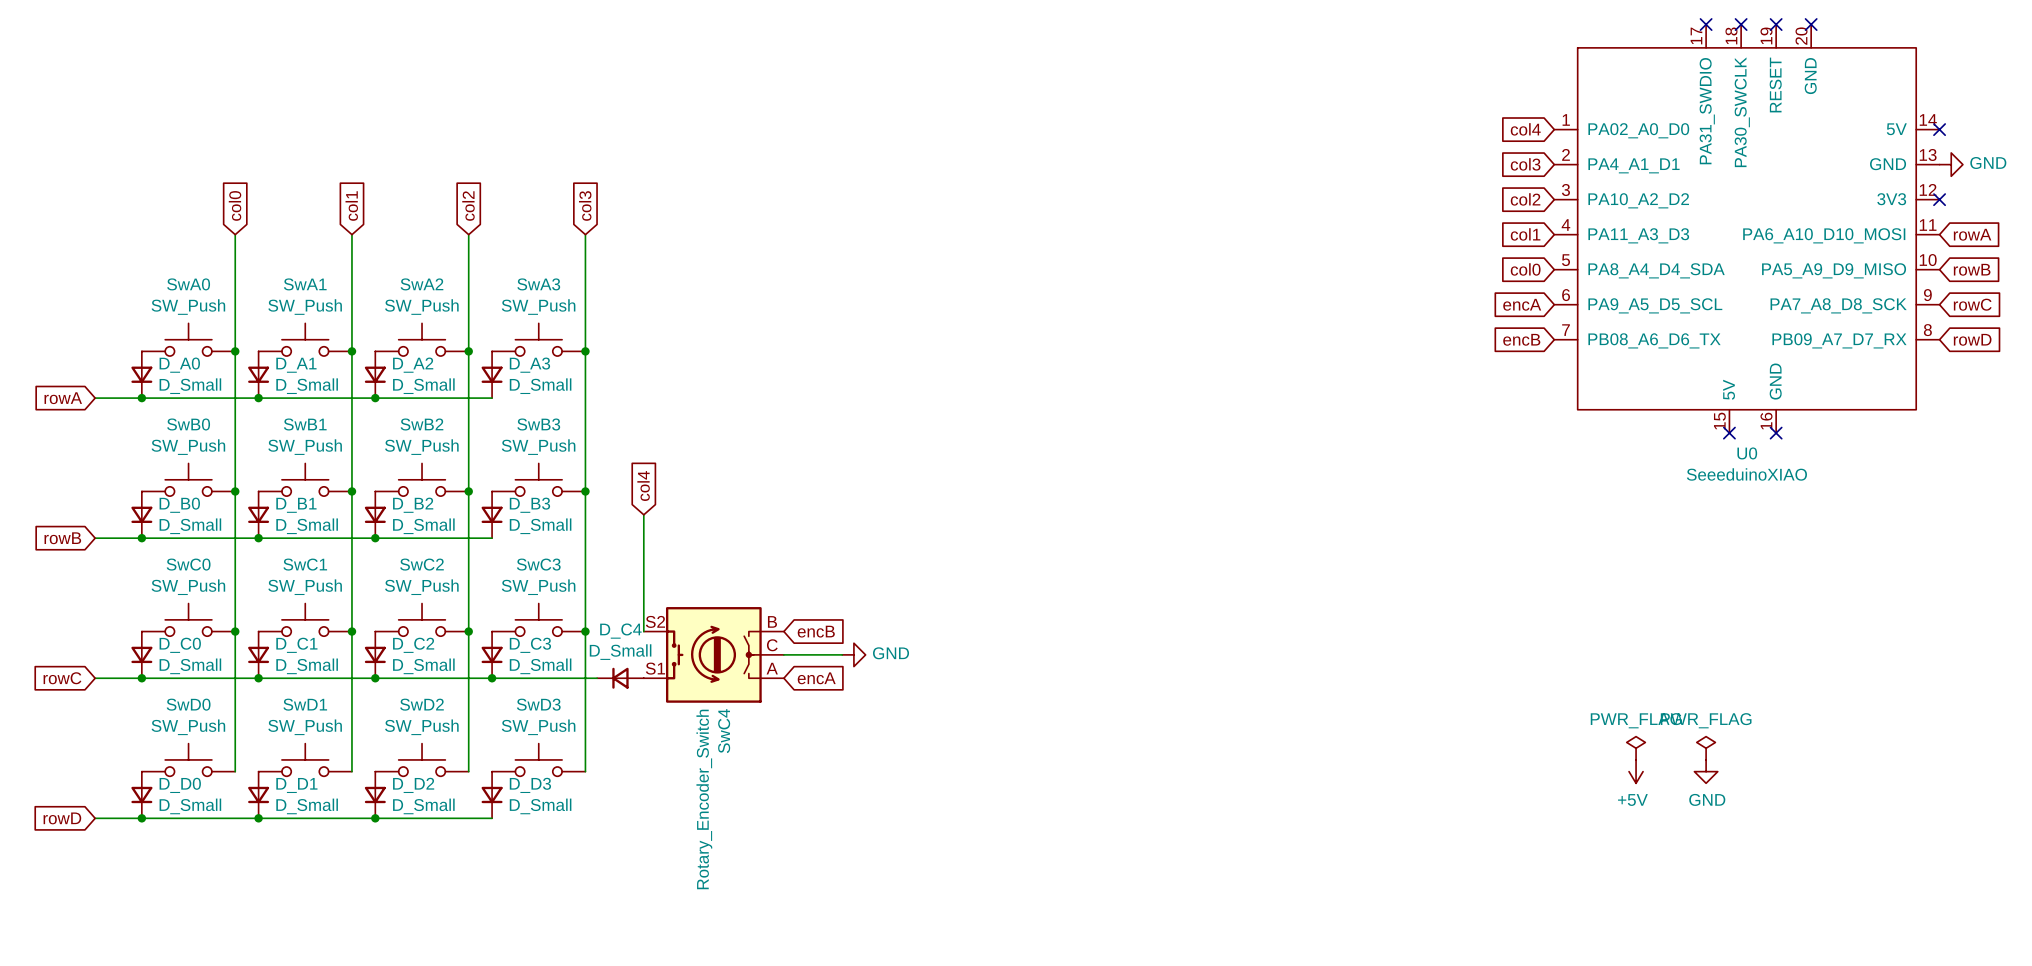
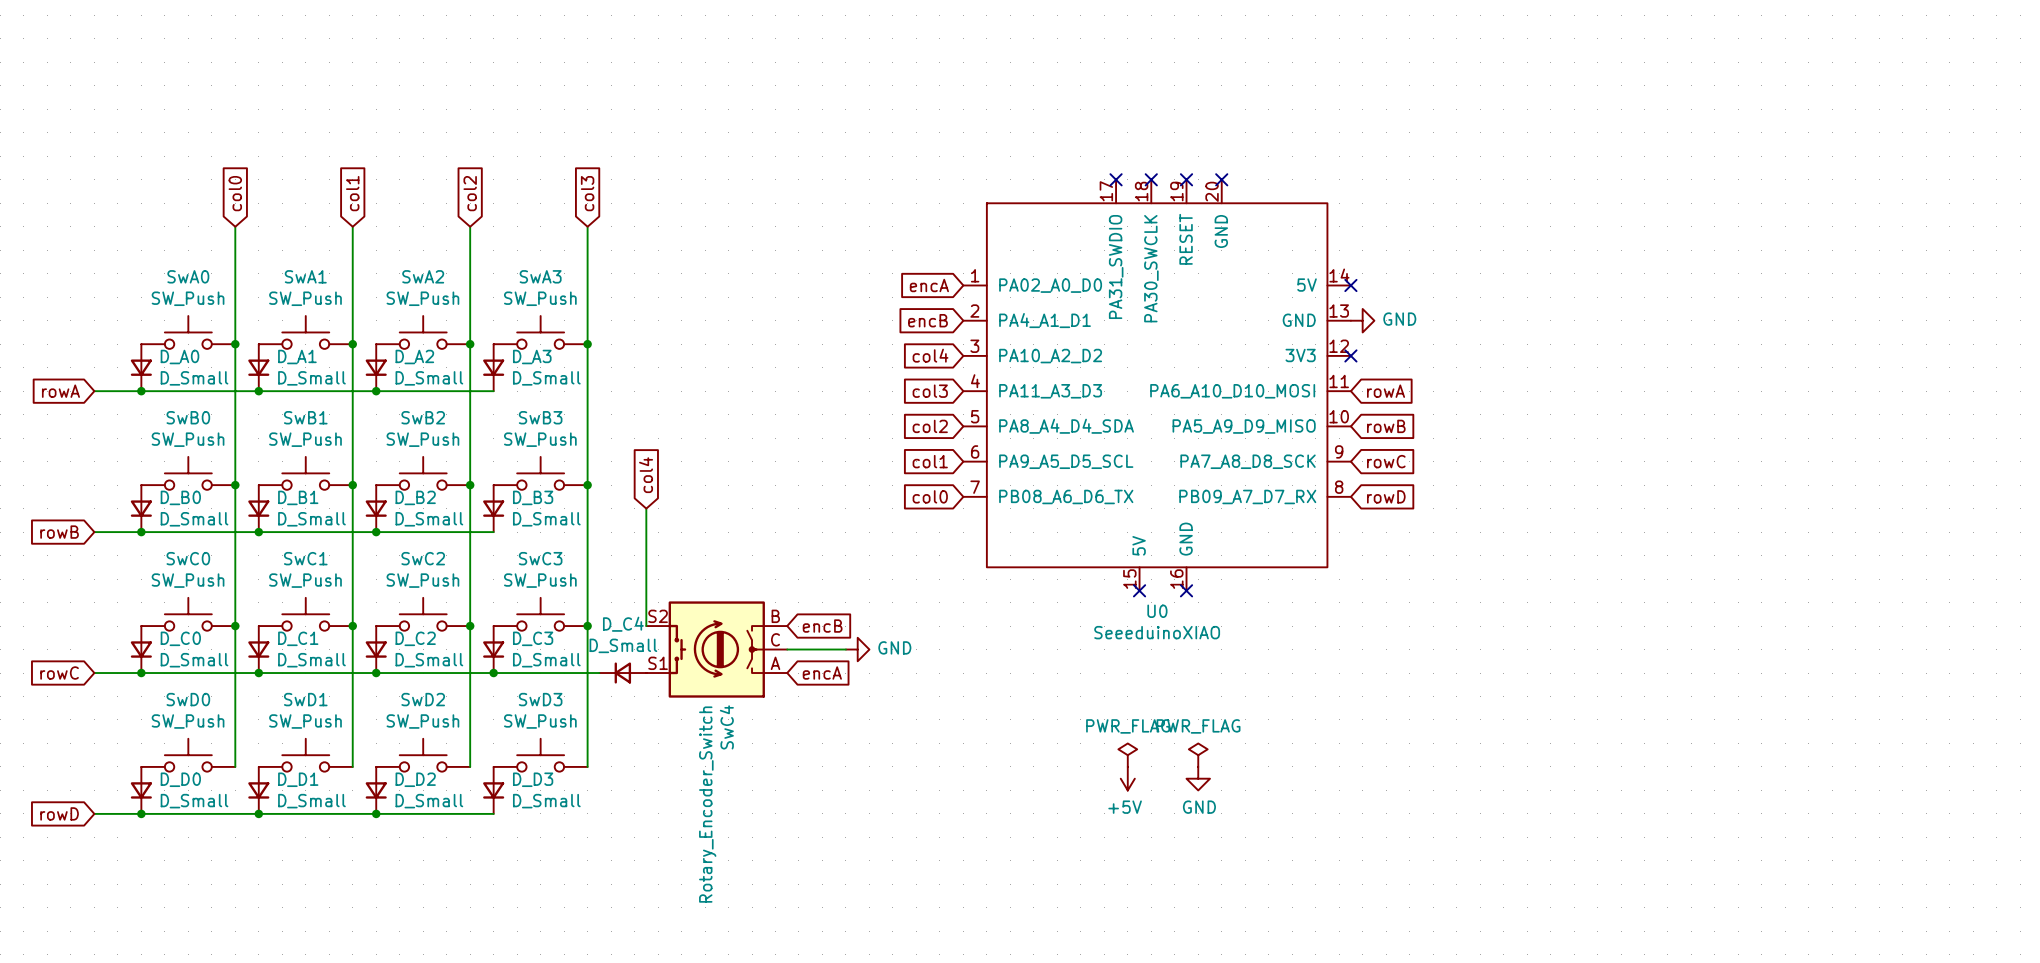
no-connect mark: (1706, 24) -> none
no-connect mark: (1741, 24) -> none
no-connect mark: (1776, 24) -> none
no-connect mark: (1811, 24) -> none
global label: col4 (1525, 129) -> none
no-connect mark: (1939, 129) -> none
global label: col3 (1525, 164) -> none
power symbol: GND (1951, 164) -> none
no-connect mark: none -> (1116, 179)
no-connect mark: none -> (1151, 179)
no-connect mark: none -> (1186, 179)
no-connect mark: none -> (1221, 179)
global label: col2 (1525, 199) -> none
no-connect mark: (1939, 199) -> none
U0 position: (1746, 228) -> (1157, 385)
global label: col1 (1525, 234) -> none
global label: rowA (1972, 234) -> none
global label: col0 (1525, 269) -> none
global label: rowB (1972, 269) -> none
global label: none -> encA (929, 285)
no-connect mark: none -> (1350, 285)
global label: encA (1522, 304) -> none
global label: rowC (1972, 304) -> none
global label: none -> encB (928, 320)
power symbol: none -> GND (1362, 320)
global label: encB (1521, 339) -> none
global label: rowD (1972, 339) -> none
global label: none -> col4 (930, 355)
no-connect mark: none -> (1350, 355)
global label: none -> col3 (930, 391)
global label: none -> rowA (1386, 391)
global label: none -> col2 (930, 426)
global label: none -> rowB (1386, 426)
no-connect mark: (1729, 433) -> none
no-connect mark: (1776, 433) -> none
global label: none -> col1 (930, 461)
global label: none -> rowC (1386, 461)
global label: none -> col0 (930, 496)
global label: none -> rowD (1386, 496)
no-connect mark: none -> (1139, 590)
no-connect mark: none -> (1186, 590)
power symbol: PWR_FLAG (1636, 748) -> none
power symbol: PWR_FLAG (1706, 748) -> none
power symbol: none -> PWR_FLAG (1127, 755)
power symbol: none -> PWR_FLAG (1198, 755)
power symbol: +5V (1636, 771) -> none
power symbol: GND (1706, 771) -> none
power symbol: none -> +5V (1127, 778)
power symbol: none -> GND (1198, 778)

